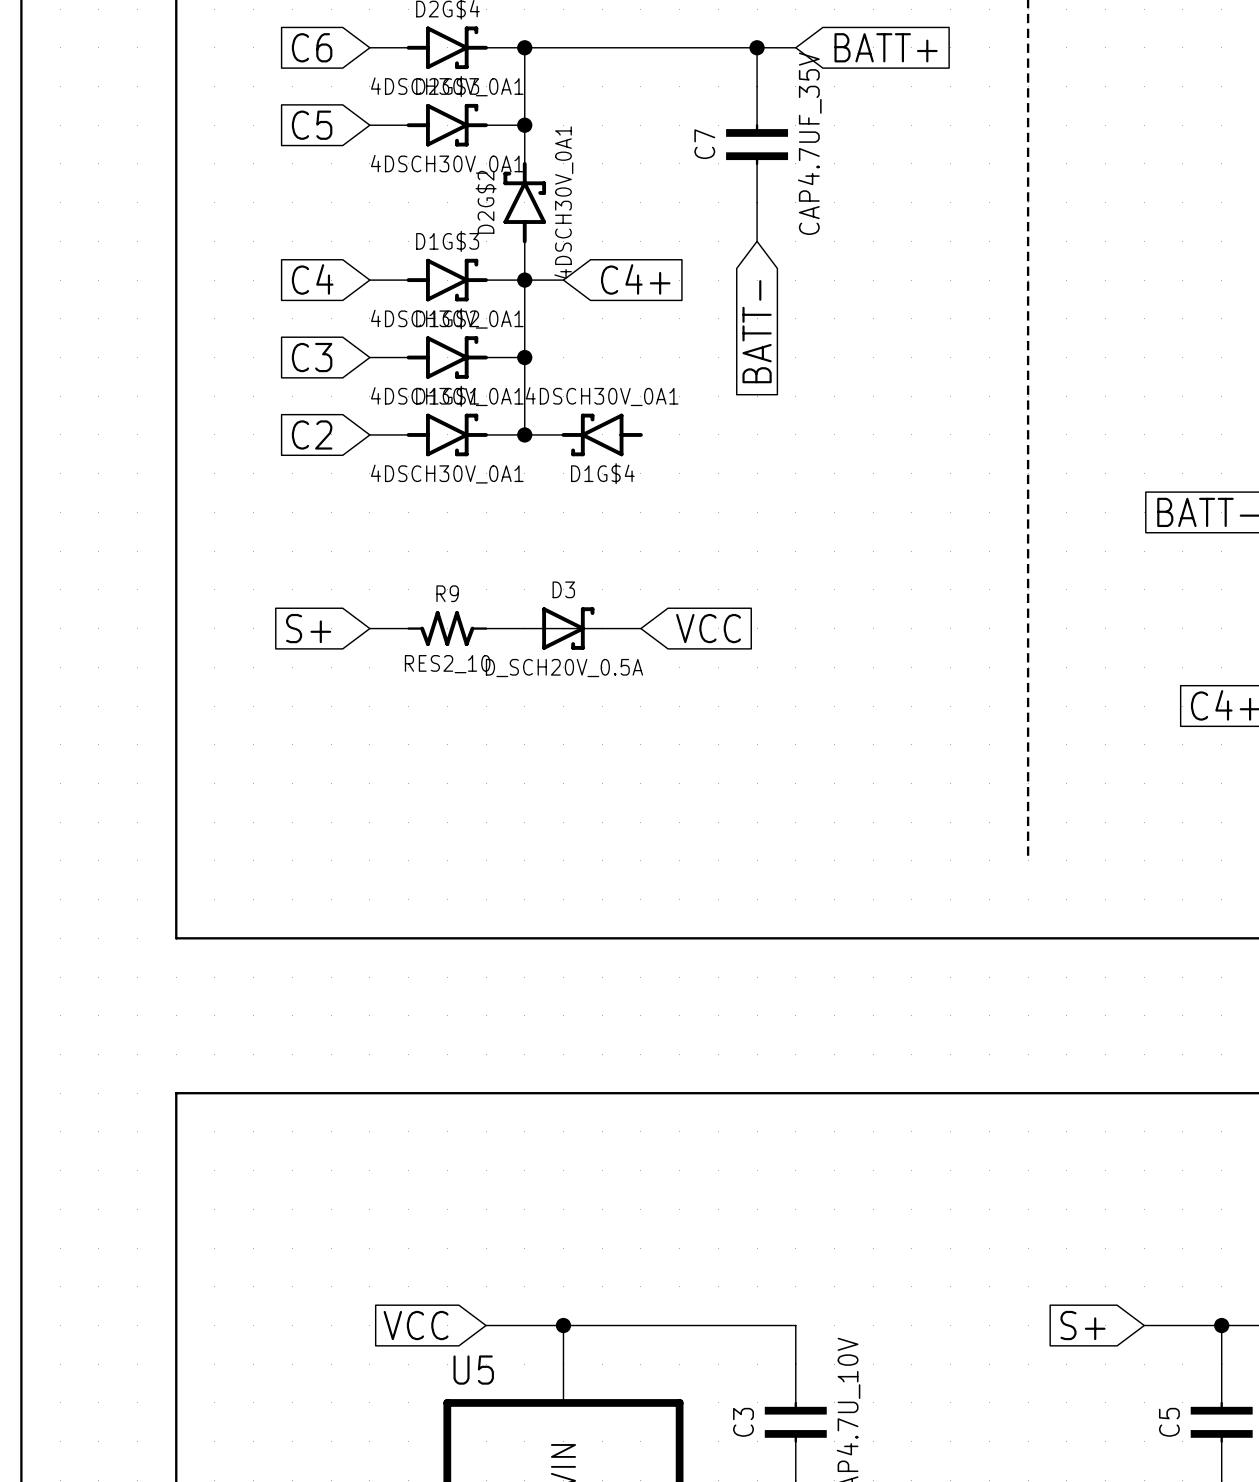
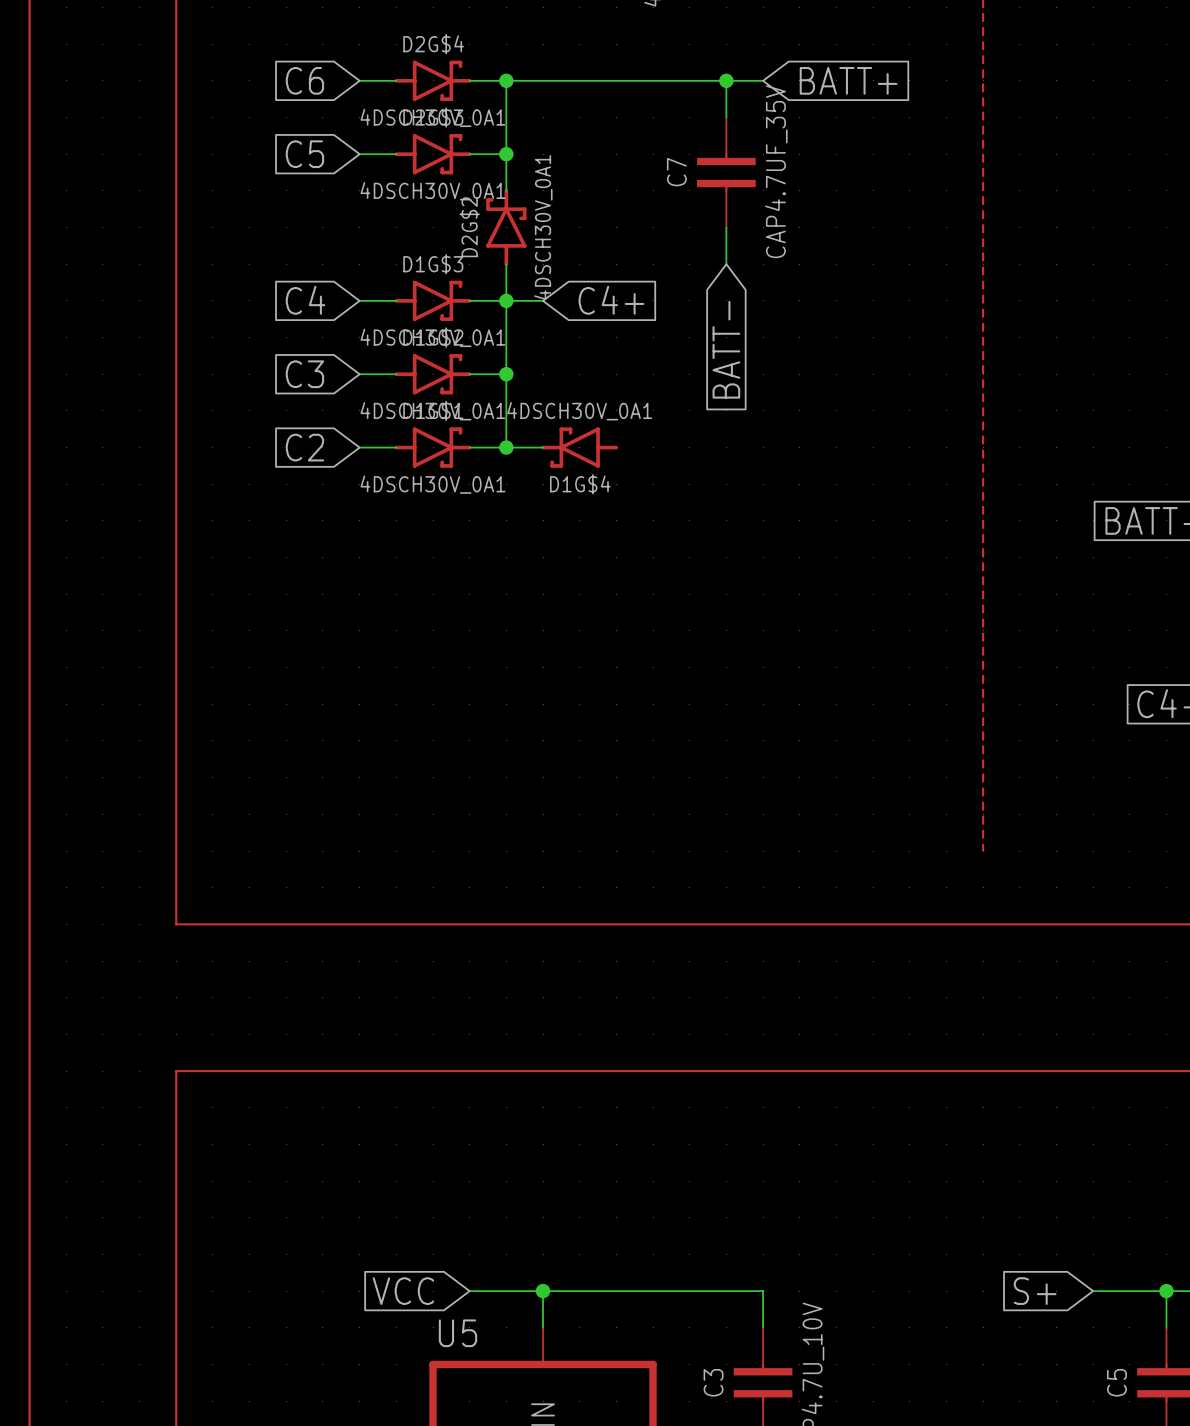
global label: S+ (308, 628) -> none
wire: (369, 628) (408, 628) -> none
R9: RES2_10 (447, 628) -> none
wire: (486, 628) (524, 628) -> none
D3: D_SCH20V_0.5A (563, 628) -> none
wire: (602, 628) (640, 628) -> none
global label: VCC (708, 628) -> none

